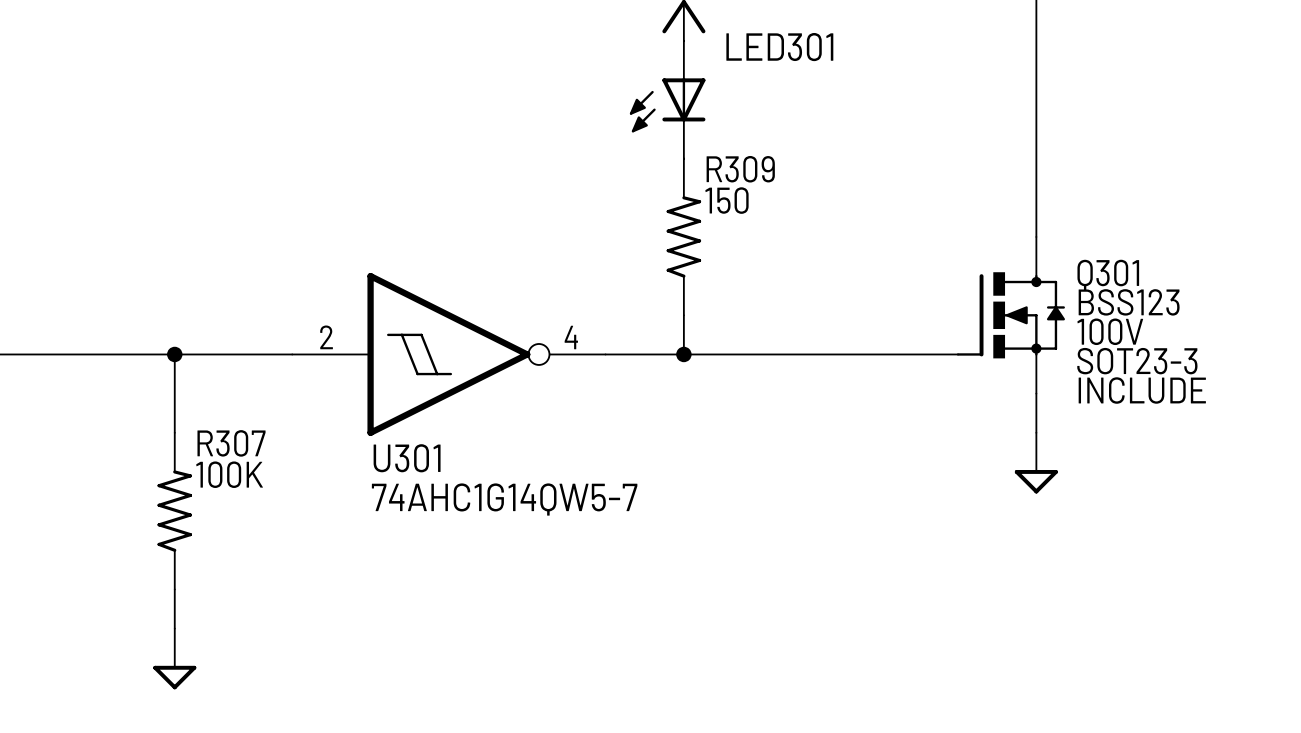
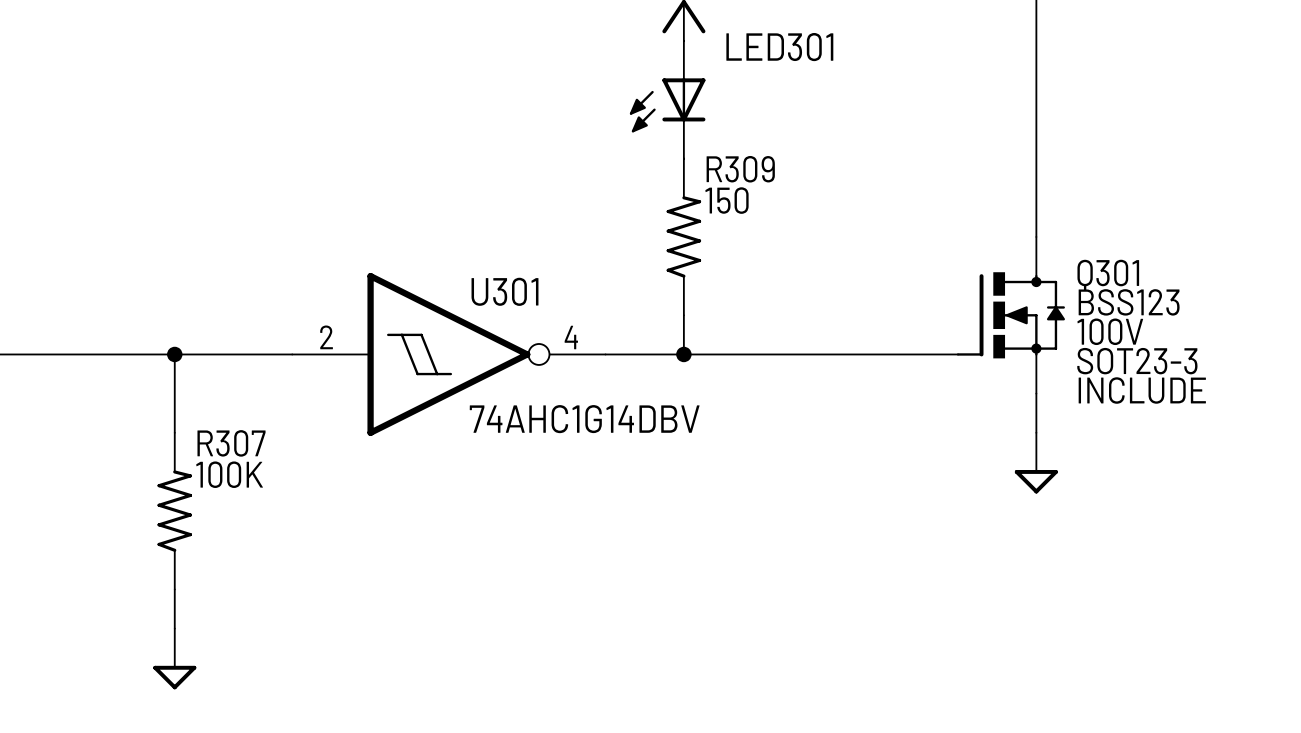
U301 value: none -> 74AHC1G14DBV (584, 419)
U301 name position: U301 (407, 458) -> U301 (504, 291)
U301 text: 74AHC1G14QW5-7 (504, 499) -> none

